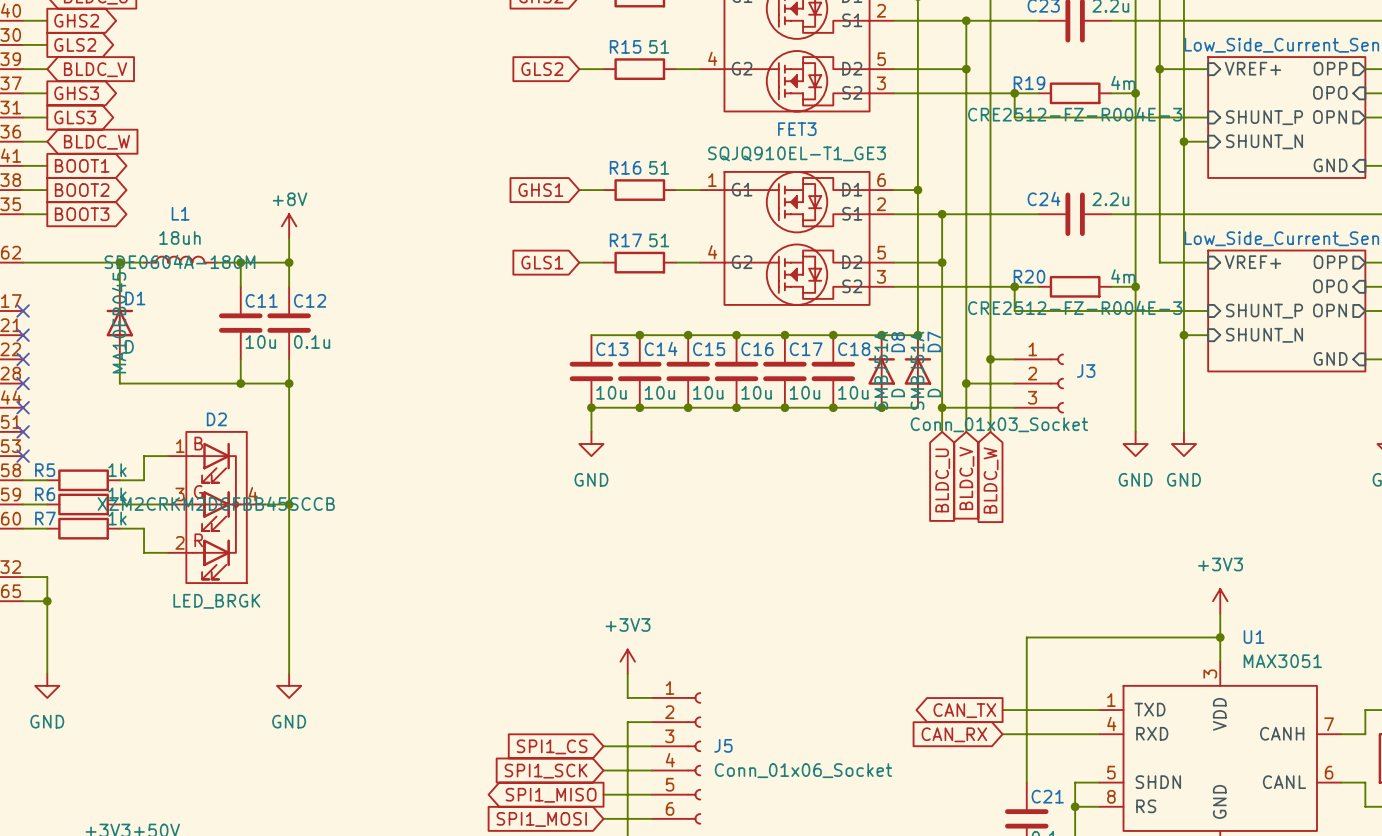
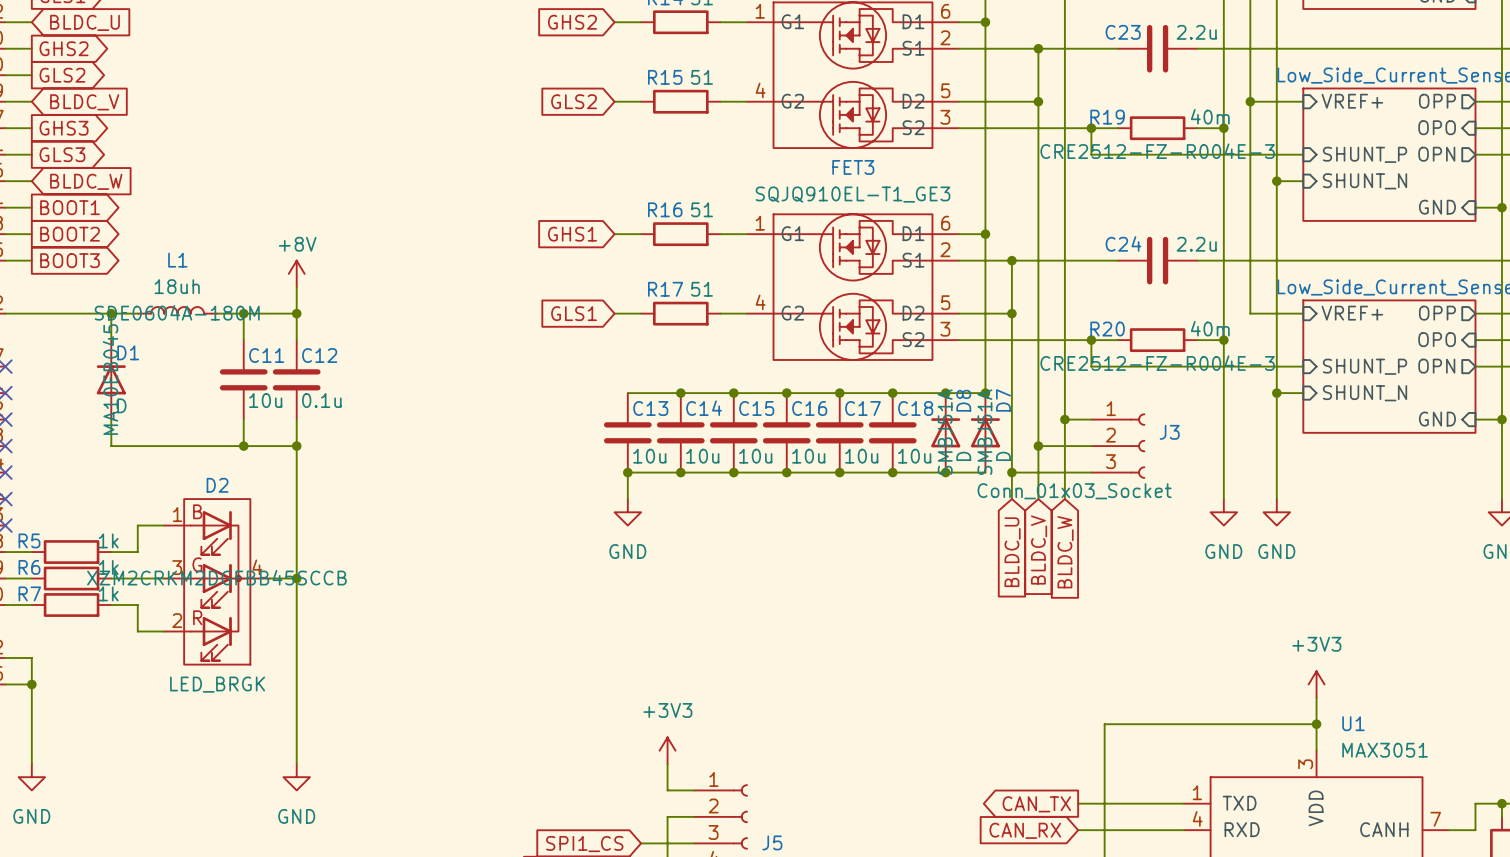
R19 value: 4m (1123, 82) -> 40m (1210, 116)
R20 value: 4m (1123, 276) -> 40m (1210, 328)

